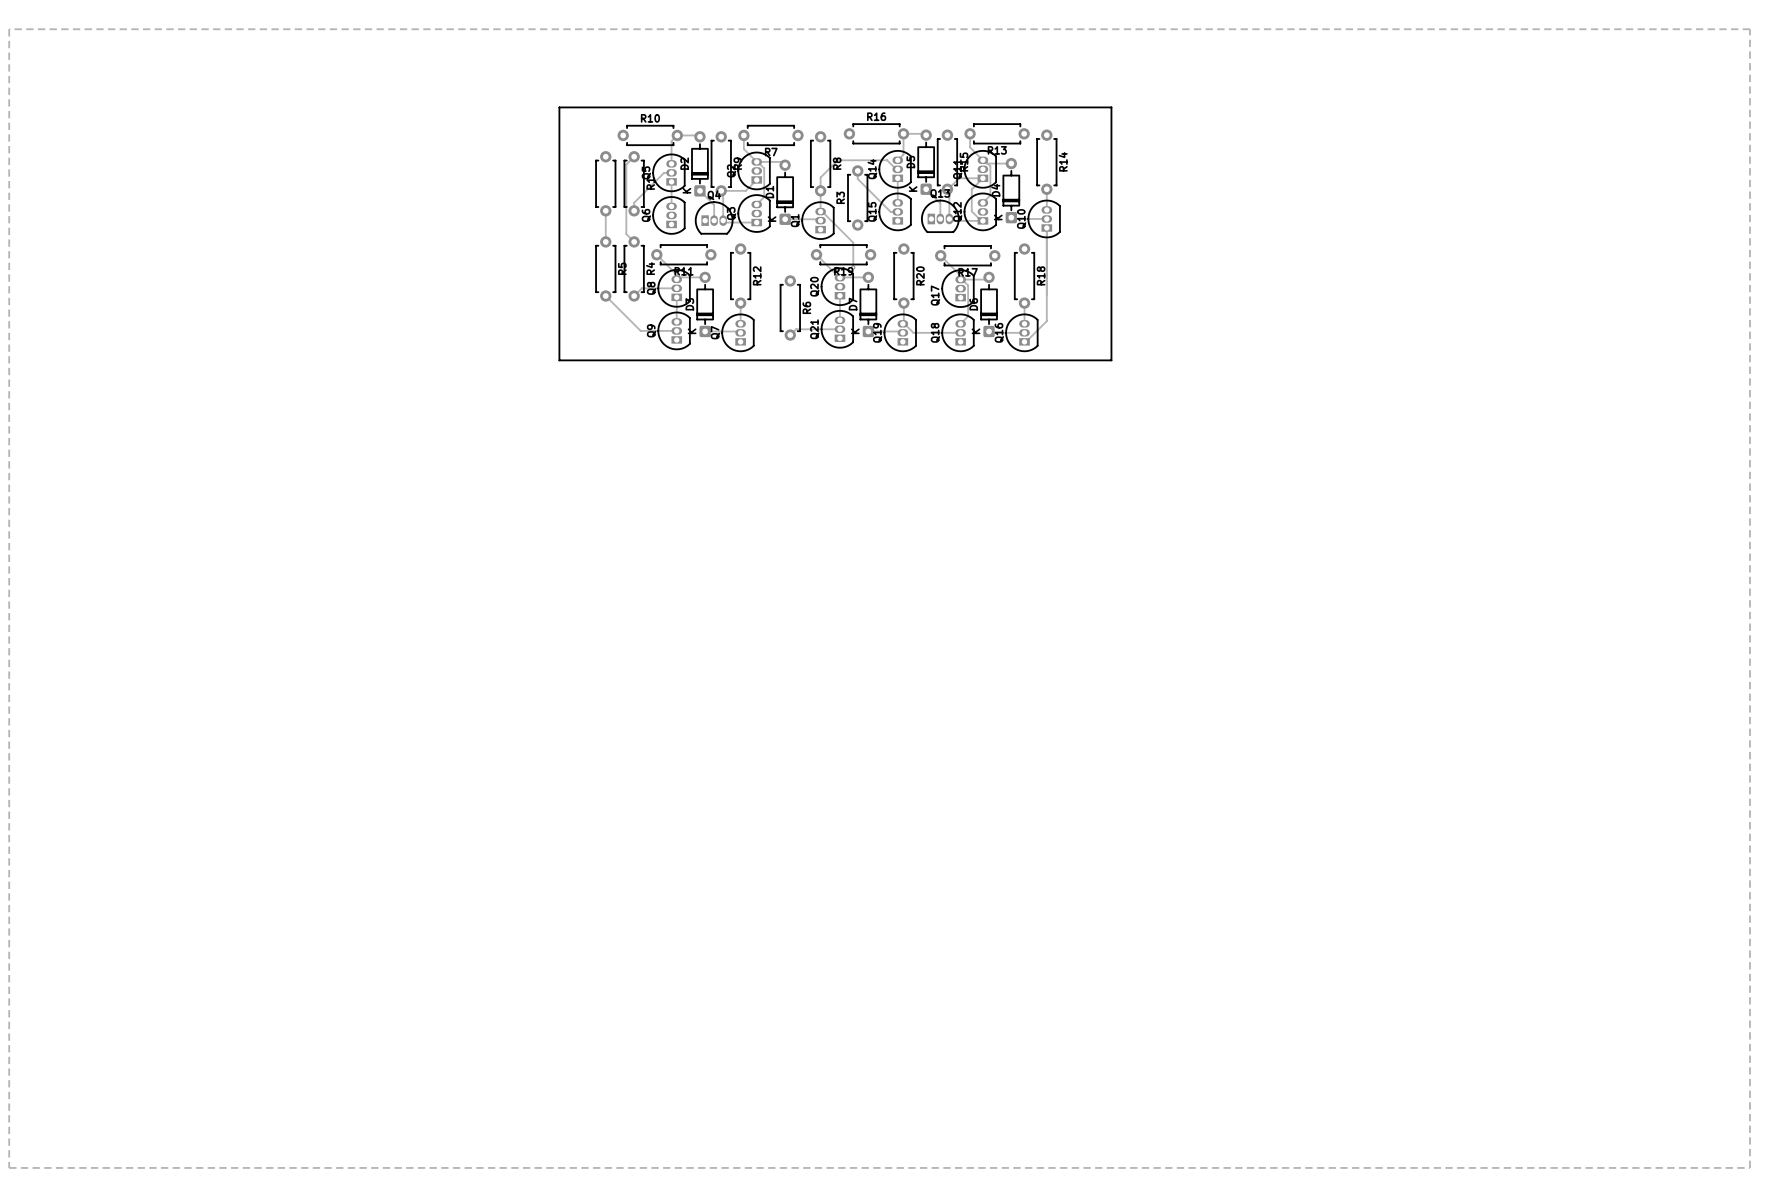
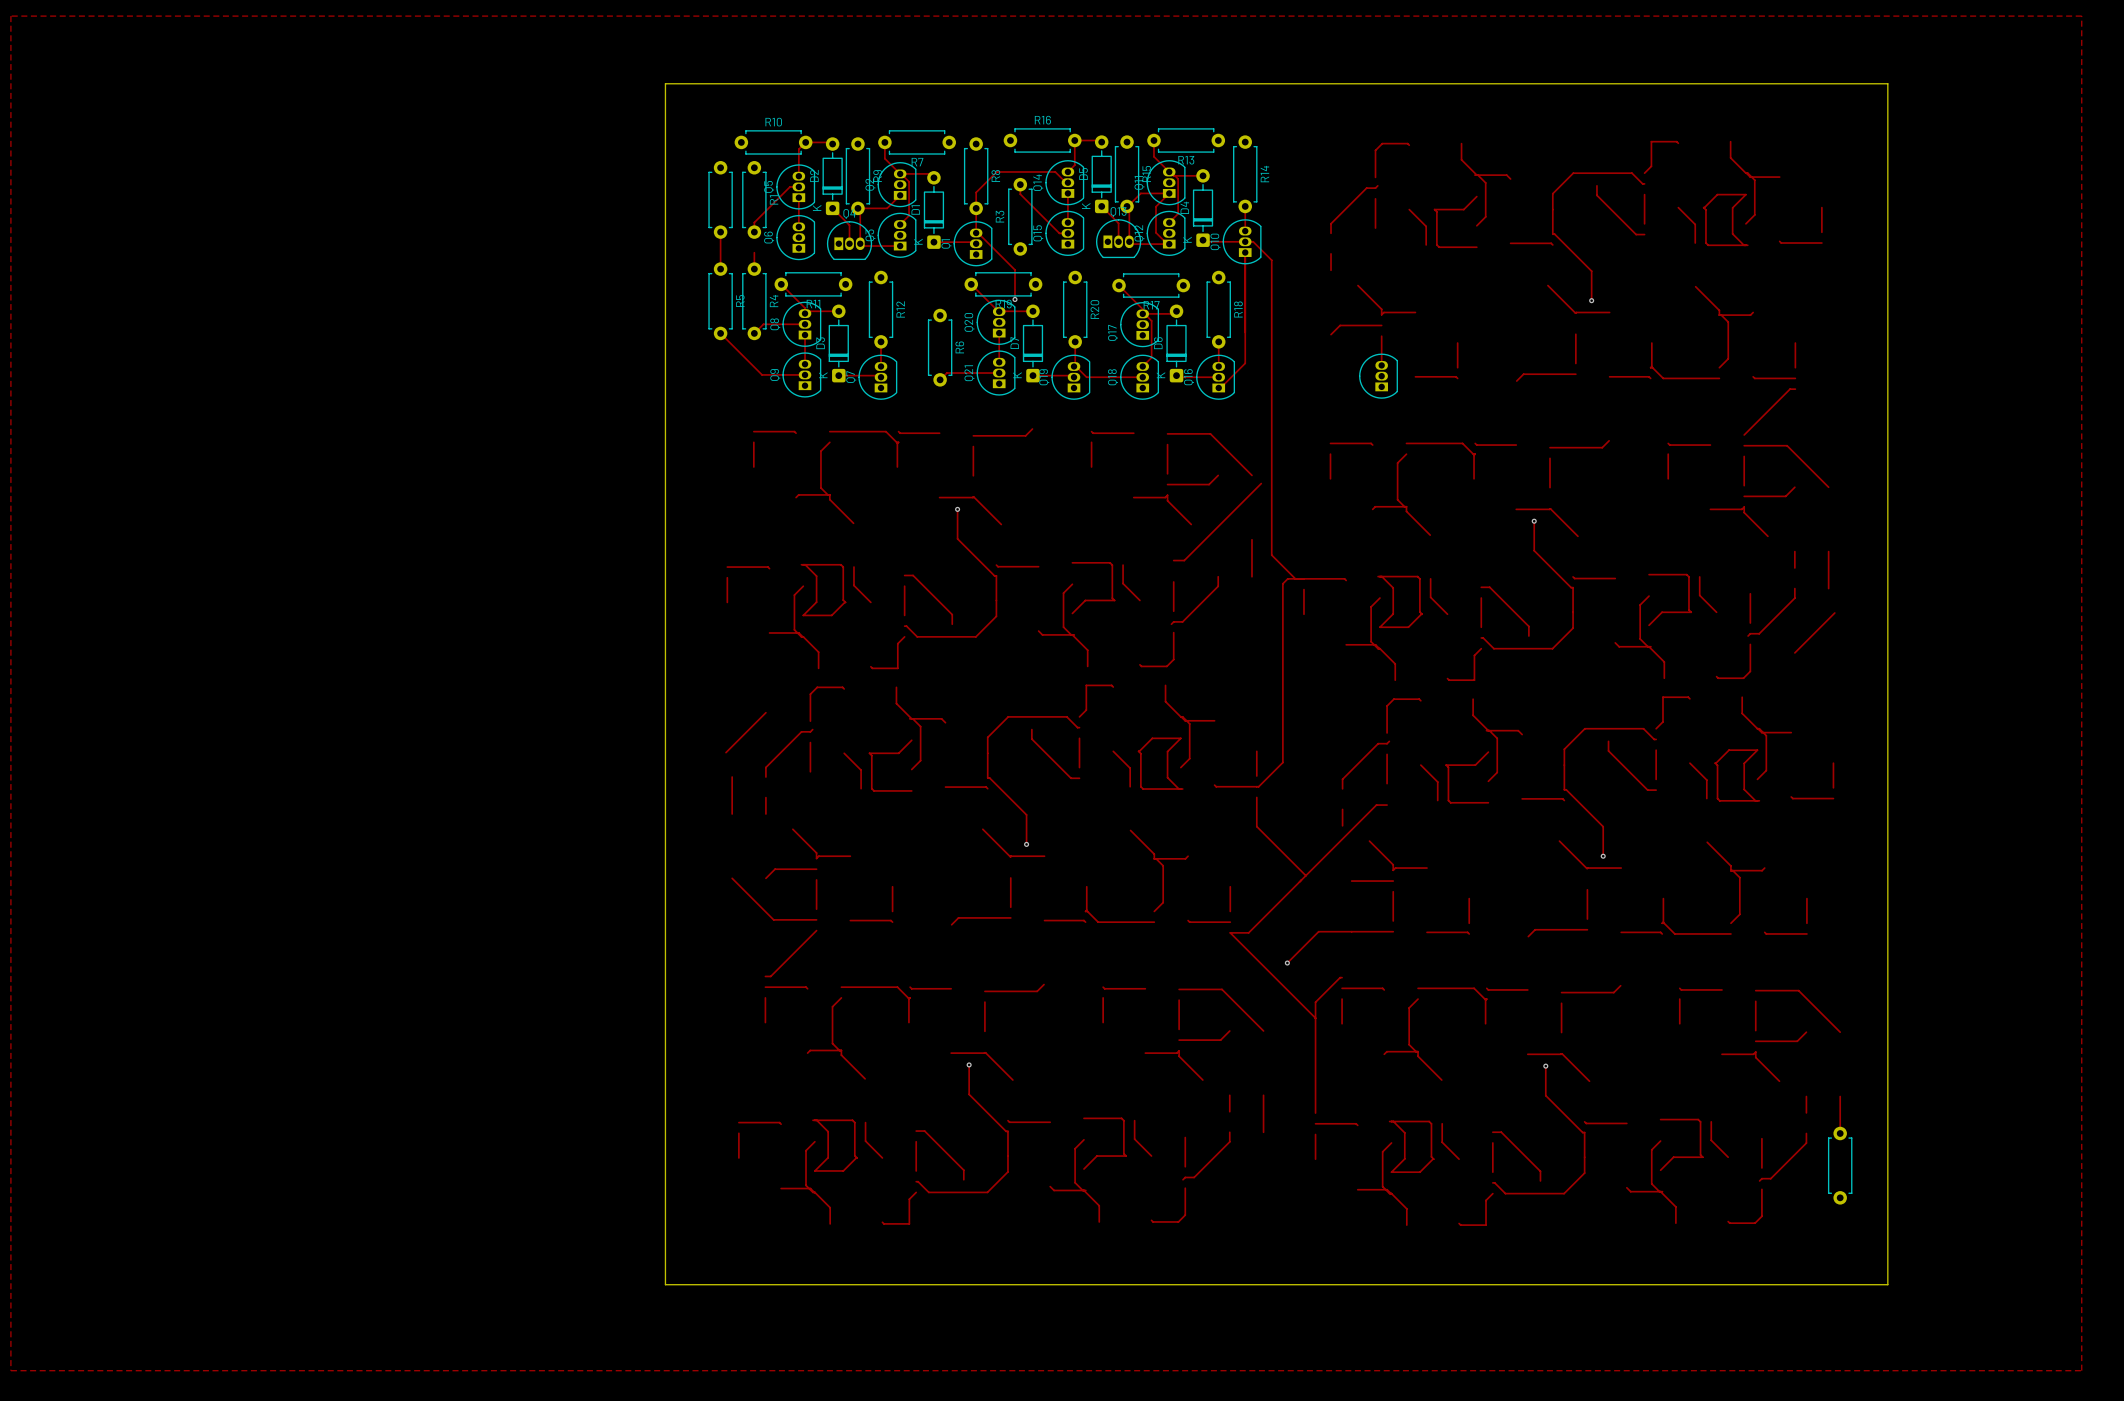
board edge: (559, 107) (1111, 107) (1111, 360) (559, 360) -> (665, 109) (665, 83) (1887, 83) (1887, 1284) (665, 1284) (665, 410)
track: none -> (1730, 141) (1730, 157) (1754, 180) (1754, 214) (1745, 223)
track: none -> (1461, 143) (1461, 159) (1476, 175)
track: none -> (1678, 143) (1676, 141) (1651, 141) (1651, 166) (1644, 173)
track: none -> (1409, 145) (1407, 143) (1382, 143) (1375, 150) (1375, 177)
track: (634, 156) (626, 164) (626, 234) (634, 241) -> (754, 252) (754, 269)
track: none -> (1746, 173) (1750, 177) (1779, 177)
track: none -> (1474, 175) (1506, 175) (1510, 179)
track: none -> (1477, 175) (1485, 182) (1485, 216) (1476, 225)
track: none -> (1644, 183) (1631, 173) (1573, 173) (1552, 193) (1552, 234) (1591, 271) (1591, 300)
track: none -> (1377, 185) (1375, 188) (1366, 188) (1331, 223) (1331, 233)
track: none -> (1596, 185) (1596, 195) (1636, 234) (1644, 234)
track: none -> (1644, 194) (1644, 223)
track: none -> (1476, 196) (1463, 209) (1434, 209) (1436, 211) (1436, 244) (1439, 247) (1476, 247)
track: none -> (1375, 198) (1375, 228)
track: none -> (1678, 207) (1695, 224) (1695, 243)
track: none -> (1821, 207) (1821, 232)
track: none -> (1409, 209) (1426, 226) (1426, 244)
track: none -> (1245, 241) (1253, 241) (1271, 260) (1271, 555) (1295, 578)
track: none -> (1779, 241) (1781, 243) (1821, 243)
track: none -> (1510, 243) (1551, 243) (1552, 244)
track: none -> (1744, 245) (1732, 233) (1732, 207) (1745, 194) (1717, 194) (1703, 207) (1705, 209) (1705, 243) (1708, 245) (1747, 245)
track: none -> (1331, 253) (1331, 270)
track: none -> (1357, 285) (1381, 309) (1381, 314) (1383, 312) (1415, 312)
track: none -> (1547, 285) (1575, 312) (1609, 312)
track: none -> (1695, 286) (1719, 310) (1719, 315) (1750, 315) (1753, 312)
via: none -> (1591, 300)
track: none -> (1721, 315) (1728, 322) (1728, 358) (1719, 367)
track: none -> (1381, 325) (1340, 325) (1331, 334)
track: none -> (1575, 334) (1575, 363)
track: none -> (1381, 336) (1381, 365)
track: none -> (1457, 343) (1457, 367)
track: none -> (1651, 343) (1650, 367) (1663, 378) (1719, 378)
track: none -> (1795, 343) (1795, 367)
track: none -> (1575, 374) (1523, 374) (1516, 381)
part: none -> (1378, 376)
track: none -> (1415, 376) (1456, 376) (1457, 378)
track: none -> (1609, 376) (1649, 376) (1650, 378)
track: none -> (1753, 376) (1754, 378) (1795, 378)
track: none -> (1795, 389) (1790, 389) (1744, 434)
track: none -> (1032, 429) (1025, 435) (973, 435)
track: none -> (753, 431) (794, 431) (796, 433)
track: none -> (829, 431) (885, 431) (898, 442) (897, 466)
track: none -> (898, 431) (900, 433) (939, 433)
track: none -> (1091, 431) (1093, 433) (1133, 433)
track: none -> (1167, 433) (1210, 433) (1251, 475)
track: none -> (1609, 440) (1602, 447) (1550, 447)
track: none -> (753, 442) (753, 466)
track: none -> (829, 442) (820, 451) (820, 487) (827, 494)
track: none -> (1091, 442) (1091, 466)
track: none -> (1330, 443) (1371, 443) (1372, 445)
track: none -> (1406, 443) (1462, 443) (1475, 454) (1474, 478)
track: none -> (1475, 443) (1476, 445) (1516, 445)
track: none -> (1668, 443) (1669, 445) (1710, 445)
track: none -> (1167, 444) (1167, 473)
track: none -> (1744, 445) (1787, 445) (1828, 487)
track: none -> (973, 446) (973, 475)
track: none -> (1330, 454) (1330, 478)
track: none -> (1406, 454) (1397, 463) (1397, 499) (1404, 506)
track: none -> (1668, 454) (1668, 478)
track: none -> (1744, 456) (1744, 485)
track: none -> (1550, 458) (1550, 487)
track: none -> (1218, 475) (1209, 484) (1167, 484)
track: none -> (1261, 483) (1184, 560) (1173, 560)
track: none -> (1794, 487) (1785, 496) (1744, 496)
track: none -> (796, 497) (798, 494) (829, 494) (829, 499) (853, 523)
track: none -> (939, 497) (974, 497) (1001, 524)
track: none -> (1133, 497) (1165, 497) (1167, 495) (1167, 500) (1191, 524)
track: none -> (957, 509) (957, 538) (996, 575) (996, 616) (975, 636) (917, 636) (904, 626)
via: none -> (957, 509)
track: none -> (1372, 509) (1375, 506) (1406, 506) (1406, 511) (1430, 535)
track: none -> (1516, 509) (1550, 509) (1577, 536)
track: none -> (1710, 509) (1741, 509) (1744, 507) (1744, 512) (1767, 536)
track: none -> (1534, 521) (1534, 550) (1573, 587) (1573, 628) (1552, 648) (1493, 648) (1481, 637)
via: none -> (1534, 521)
track: none -> (1251, 539) (1251, 576)
track: none -> (1794, 551) (1794, 567)
track: none -> (1828, 551) (1828, 588)
track: none -> (1072, 562) (1110, 562) (1112, 565) (1112, 598) (1114, 600) (1085, 600) (1072, 613)
track: none -> (801, 564) (840, 564) (843, 567) (843, 600) (845, 602) (831, 615) (803, 615) (816, 602) (816, 576) (805, 564)
track: none -> (996, 565) (998, 566) (1038, 566)
track: none -> (1123, 565) (1123, 583) (1139, 600)
track: none -> (727, 567) (767, 567) (769, 568)
track: none -> (853, 567) (853, 585) (870, 602)
track: none -> (1649, 574) (1686, 574) (1688, 576) (1688, 610) (1691, 612) (1662, 612) (1649, 625)
track: none -> (904, 575) (913, 575) (952, 614) (952, 624)
track: none -> (1218, 576) (1218, 586) (1182, 621) (1173, 621) (1171, 624)
track: none -> (1378, 576) (1417, 576) (1419, 578) (1419, 611) (1422, 614) (1408, 627) (1379, 627) (1393, 613) (1393, 587) (1381, 576)
track: none -> (1573, 576) (1574, 578) (1615, 578)
track: none -> (1699, 576) (1699, 595) (1716, 612)
track: none -> (727, 577) (727, 602)
track: none -> (1430, 578) (1430, 597) (1447, 614)
track: none -> (1346, 580) (1344, 578) (1287, 578) (1282, 583) (1282, 762) (1258, 786) (1216, 786) (1214, 785)
track: none -> (1173, 581) (1173, 611)
track: none -> (1072, 584) (1063, 593) (1063, 627) (1071, 634)
track: none -> (803, 586) (794, 595) (794, 629) (818, 652) (818, 668)
track: none -> (904, 586) (904, 615)
track: none -> (1481, 587) (1489, 587) (1528, 626) (1528, 636)
track: none -> (1794, 588) (1794, 598) (1759, 633) (1750, 633) (1748, 636)
track: none -> (1303, 589) (1303, 614)
track: none -> (1750, 593) (1750, 623)
track: none -> (1649, 596) (1640, 604) (1640, 638) (1647, 646)
track: none -> (1379, 598) (1371, 606) (1371, 641) (1395, 663) (1395, 680)
track: none -> (1481, 598) (1481, 627)
track: none -> (1834, 612) (1794, 652)
track: none -> (1038, 631) (1042, 634) (1074, 634)
track: none -> (769, 632) (798, 632) (802, 636)
track: none -> (1173, 632) (1173, 659) (1166, 666) (1141, 666) (1139, 664)
track: none -> (1072, 634) (1087, 650) (1087, 666)
track: none -> (904, 636) (897, 643) (897, 668) (872, 668) (870, 666)
track: none -> (1615, 642) (1619, 646) (1650, 646)
track: none -> (1346, 644) (1375, 644) (1379, 648)
track: none -> (1750, 644) (1750, 671) (1743, 678) (1718, 678) (1716, 676)
track: none -> (1649, 646) (1664, 662) (1664, 678)
track: none -> (1481, 648) (1474, 655) (1474, 680) (1449, 680) (1447, 678)
track: none -> (1165, 685) (1165, 701) (1189, 723) (1189, 758) (1180, 767)
track: none -> (896, 687) (896, 703) (911, 718)
track: none -> (1113, 687) (1111, 685) (1086, 685) (1086, 710) (1079, 716)
track: none -> (844, 688) (842, 687) (817, 687) (810, 694) (810, 721)
track: none -> (1742, 697) (1742, 713) (1766, 735) (1766, 770) (1757, 779)
track: none -> (1473, 699) (1473, 715) (1488, 730)
track: none -> (1689, 698) (1688, 697) (1662, 697) (1662, 721) (1656, 728)
track: none -> (1420, 700) (1419, 699) (1393, 699) (1387, 706) (1387, 732)
track: none -> (765, 712) (725, 752)
track: none -> (1181, 716) (1185, 720) (1214, 720)
track: none -> (909, 718) (941, 718) (945, 722)
track: none -> (912, 718) (920, 726) (920, 760) (911, 769)
track: none -> (1079, 727) (1066, 716) (1008, 716) (987, 737) (987, 777) (1026, 814) (1026, 844)
track: none -> (1757, 728) (1761, 732) (1791, 732)
track: none -> (812, 729) (810, 731) (801, 731) (765, 767) (765, 777)
track: none -> (1031, 729) (1031, 739) (1071, 778) (1079, 778)
track: none -> (1486, 730) (1518, 730) (1522, 734)
track: none -> (1489, 730) (1497, 738) (1497, 772) (1488, 781)
track: none -> (1079, 738) (1079, 767)
track: none -> (1656, 739) (1643, 728) (1584, 728) (1564, 749) (1564, 789) (1603, 826) (1603, 856)
track: none -> (911, 740) (898, 753) (869, 753) (871, 755) (871, 788) (874, 790) (911, 790)
track: none -> (1389, 741) (1387, 743) (1378, 743) (1342, 779) (1342, 788)
track: none -> (1608, 741) (1608, 750) (1647, 790) (1656, 790)
track: none -> (810, 742) (810, 771)
track: none -> (1656, 750) (1656, 779)
track: none -> (1113, 751) (1130, 768) (1130, 786)
track: none -> (1256, 751) (1256, 776)
track: none -> (1488, 752) (1475, 765) (1446, 765) (1448, 767) (1448, 800) (1450, 802) (1488, 802)
track: none -> (844, 753) (861, 770) (861, 788)
track: none -> (1387, 754) (1387, 783)
track: none -> (1689, 763) (1706, 780) (1706, 798)
track: none -> (1833, 763) (1833, 787)
track: none -> (1420, 765) (1437, 782) (1437, 800)
track: none -> (732, 777) (732, 814)
track: none -> (945, 787) (986, 787) (987, 788)
track: none -> (1178, 789) (1167, 777) (1167, 751) (1180, 738) (1152, 738) (1138, 751) (1140, 753) (1140, 786) (1143, 789) (1182, 789)
track: none -> (1791, 796) (1792, 798) (1833, 798)
track: none -> (765, 797) (765, 814)
track: none -> (1256, 797) (1256, 826) (1305, 875)
track: none -> (1522, 798) (1562, 798) (1564, 800)
track: none -> (1755, 800) (1744, 789) (1744, 763) (1757, 750) (1729, 750) (1715, 763) (1717, 765) (1717, 798) (1719, 800) (1759, 800)
track: none -> (1387, 805) (1376, 805) (1248, 932) (1230, 932) (1315, 1018)
track: none -> (1342, 809) (1342, 825)
track: none -> (792, 829) (816, 853) (816, 858) (818, 856) (850, 856)
track: none -> (982, 829) (1010, 856) (1044, 856)
track: none -> (1130, 830) (1154, 854) (1154, 858) (1185, 858) (1188, 856)
track: none -> (1369, 841) (1393, 864) (1393, 870) (1395, 868) (1427, 868)
track: none -> (1559, 841) (1586, 868) (1621, 868)
track: none -> (1707, 842) (1730, 866) (1730, 870) (1762, 870) (1764, 868)
via: none -> (1026, 844)
via: none -> (1603, 856)
track: none -> (1156, 858) (1163, 865) (1163, 902) (1154, 911)
track: none -> (816, 869) (775, 869) (765, 878)
track: none -> (1732, 870) (1739, 877) (1739, 914) (1730, 923)
track: none -> (1010, 878) (1010, 907)
track: none -> (732, 878) (773, 919) (816, 919)
track: none -> (816, 879) (816, 909)
track: none -> (1351, 881) (1393, 881)
track: none -> (892, 886) (892, 911)
track: none -> (1086, 886) (1085, 911) (1098, 922) (1154, 922)
track: none -> (1230, 886) (1230, 911)
track: none -> (1587, 889) (1587, 919)
track: none -> (1393, 891) (1393, 920)
track: none -> (1469, 898) (1469, 923)
track: none -> (1663, 898) (1662, 923) (1674, 933) (1730, 933)
track: none -> (1806, 898) (1806, 923)
track: none -> (1010, 917) (958, 917) (951, 924)
track: none -> (850, 920) (890, 920) (892, 922)
track: none -> (1044, 920) (1083, 920) (1085, 922)
track: none -> (1188, 920) (1189, 922) (1230, 922)
track: none -> (1587, 929) (1535, 929) (1528, 936)
track: none -> (816, 930) (770, 976) (765, 976)
track: none -> (1393, 931) (1318, 931) (1287, 963)
track: none -> (1427, 932) (1467, 932) (1469, 933)
track: none -> (1621, 932) (1660, 932) (1662, 933)
track: none -> (1764, 932) (1766, 933) (1806, 933)
via: none -> (1287, 963)
track: none -> (1342, 977) (1315, 1002) (1315, 1113)
track: none -> (1044, 984) (1037, 991) (984, 991)
track: none -> (1620, 985) (1613, 992) (1561, 992)
track: none -> (765, 987) (806, 987) (807, 988)
track: none -> (841, 987) (897, 987) (910, 997) (908, 1022)
track: none -> (910, 987) (911, 988) (951, 988)
track: none -> (1103, 987) (1104, 988) (1145, 988)
track: none -> (1342, 988) (1382, 988) (1384, 989)
track: none -> (1418, 988) (1474, 988) (1486, 999) (1485, 1023)
track: none -> (1486, 988) (1488, 989) (1527, 989)
track: none -> (1679, 988) (1681, 989) (1721, 989)
track: none -> (1179, 989) (1222, 989) (1263, 1030)
track: none -> (1755, 990) (1798, 990) (1840, 1032)
track: none -> (765, 997) (765, 1022)
track: none -> (841, 997) (832, 1006) (832, 1043) (839, 1050)
track: none -> (1103, 997) (1103, 1022)
track: none -> (1342, 999) (1342, 1023)
track: none -> (1418, 999) (1409, 1007) (1409, 1044) (1416, 1051)
track: none -> (1679, 999) (1679, 1023)
track: none -> (1179, 1000) (1179, 1029)
track: none -> (1755, 1001) (1755, 1030)
track: none -> (984, 1002) (984, 1031)
track: none -> (1561, 1003) (1561, 1032)
track: none -> (1229, 1030) (1220, 1040) (1179, 1040)
track: none -> (1806, 1032) (1797, 1041) (1755, 1041)
track: none -> (807, 1053) (810, 1050) (841, 1050) (841, 1055) (865, 1078)
track: none -> (951, 1053) (985, 1052) (1012, 1080)
track: none -> (1145, 1053) (1176, 1053) (1179, 1050) (1179, 1056) (1202, 1080)
track: none -> (1384, 1054) (1386, 1051) (1418, 1051) (1418, 1056) (1441, 1080)
track: none -> (1527, 1054) (1562, 1053) (1589, 1081)
track: none -> (1721, 1054) (1753, 1054) (1755, 1052) (1755, 1057) (1779, 1081)
track: none -> (969, 1064) (969, 1094) (1007, 1131) (1007, 1171) (987, 1192) (928, 1192) (916, 1181)
via: none -> (969, 1064)
track: none -> (1545, 1066) (1545, 1095) (1584, 1132) (1584, 1173) (1564, 1193) (1505, 1193) (1492, 1182)
via: none -> (1545, 1066)
track: none -> (1229, 1095) (1229, 1111)
track: none -> (1263, 1095) (1263, 1132)
track: none -> (1806, 1096) (1806, 1112)
track: none -> (1840, 1096) (1840, 1133)
track: none -> (1083, 1118) (1121, 1118) (1123, 1120) (1123, 1153) (1126, 1156) (1096, 1156) (1083, 1169)
track: none -> (1660, 1119) (1698, 1119) (1700, 1121) (1700, 1154) (1702, 1157) (1673, 1157) (1660, 1170)
track: none -> (812, 1120) (852, 1120) (854, 1122) (854, 1155) (857, 1157) (843, 1170) (814, 1170) (828, 1157) (828, 1131) (816, 1120)
track: none -> (1007, 1120) (1009, 1122) (1050, 1122)
track: none -> (1134, 1120) (1134, 1139) (1151, 1156)
track: none -> (1389, 1121) (1429, 1121) (1431, 1123) (1431, 1156) (1433, 1159) (1419, 1172) (1391, 1172) (1404, 1158) (1404, 1132) (1393, 1121)
track: none -> (1584, 1121) (1586, 1123) (1626, 1123)
track: none -> (1711, 1121) (1711, 1140) (1728, 1157)
track: none -> (738, 1122) (779, 1122) (781, 1124)
track: none -> (865, 1122) (865, 1141) (882, 1157)
track: none -> (1315, 1123) (1356, 1123) (1357, 1125)
track: none -> (1442, 1123) (1442, 1142) (1459, 1159)
track: none -> (916, 1131) (924, 1131) (963, 1170) (963, 1179)
track: none -> (1229, 1132) (1229, 1141) (1194, 1177) (1185, 1177) (1183, 1179)
track: none -> (1492, 1132) (1501, 1132) (1540, 1171) (1540, 1180)
track: none -> (738, 1133) (738, 1157)
track: none -> (1806, 1133) (1806, 1143) (1770, 1178) (1761, 1178) (1759, 1180)
track: none -> (1315, 1134) (1315, 1159)
track: none -> (1185, 1137) (1185, 1166)
track: none -> (1761, 1138) (1761, 1167)
track: none -> (1083, 1139) (1075, 1148) (1075, 1182) (1082, 1190)
track: none -> (1660, 1141) (1651, 1149) (1651, 1183) (1659, 1191)
track: none -> (814, 1141) (806, 1150) (806, 1185) (830, 1207) (830, 1223)
track: none -> (916, 1141) (916, 1170)
track: none -> (1391, 1142) (1382, 1151) (1382, 1186) (1406, 1208) (1406, 1225)
track: none -> (1492, 1142) (1492, 1172)
part: none -> (1840, 1165)
track: none -> (1050, 1186) (1054, 1190) (1085, 1190)
track: none -> (781, 1188) (810, 1188) (814, 1192)
track: none -> (1185, 1188) (1185, 1215) (1178, 1221) (1153, 1221) (1151, 1220)
track: none -> (1626, 1187) (1630, 1191) (1662, 1191)
track: none -> (1357, 1189) (1387, 1189) (1391, 1193)
track: none -> (1761, 1189) (1761, 1216) (1755, 1223) (1729, 1223) (1728, 1221)
track: none -> (1083, 1190) (1099, 1205) (1099, 1221)
track: none -> (1660, 1191) (1675, 1206) (1675, 1223)
track: none -> (916, 1192) (909, 1199) (909, 1223) (884, 1223) (882, 1222)
track: none -> (1492, 1193) (1486, 1200) (1486, 1225) (1460, 1225) (1459, 1223)

